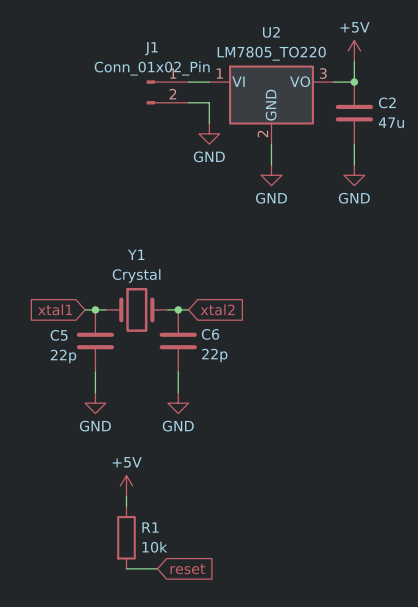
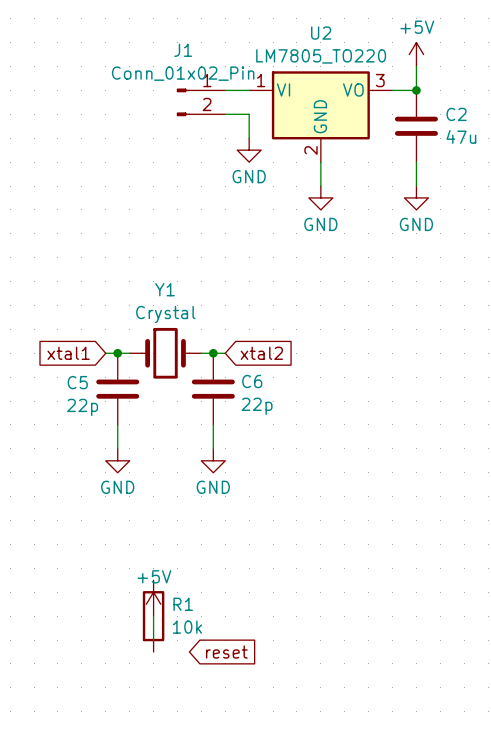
power symbol position: +5V (126, 485) -> +5V (153, 604)
wire: (126, 496) (126, 506) -> none
wire: none -> (153, 616) (153, 640)
wire: (126, 568) (157, 568) -> none

